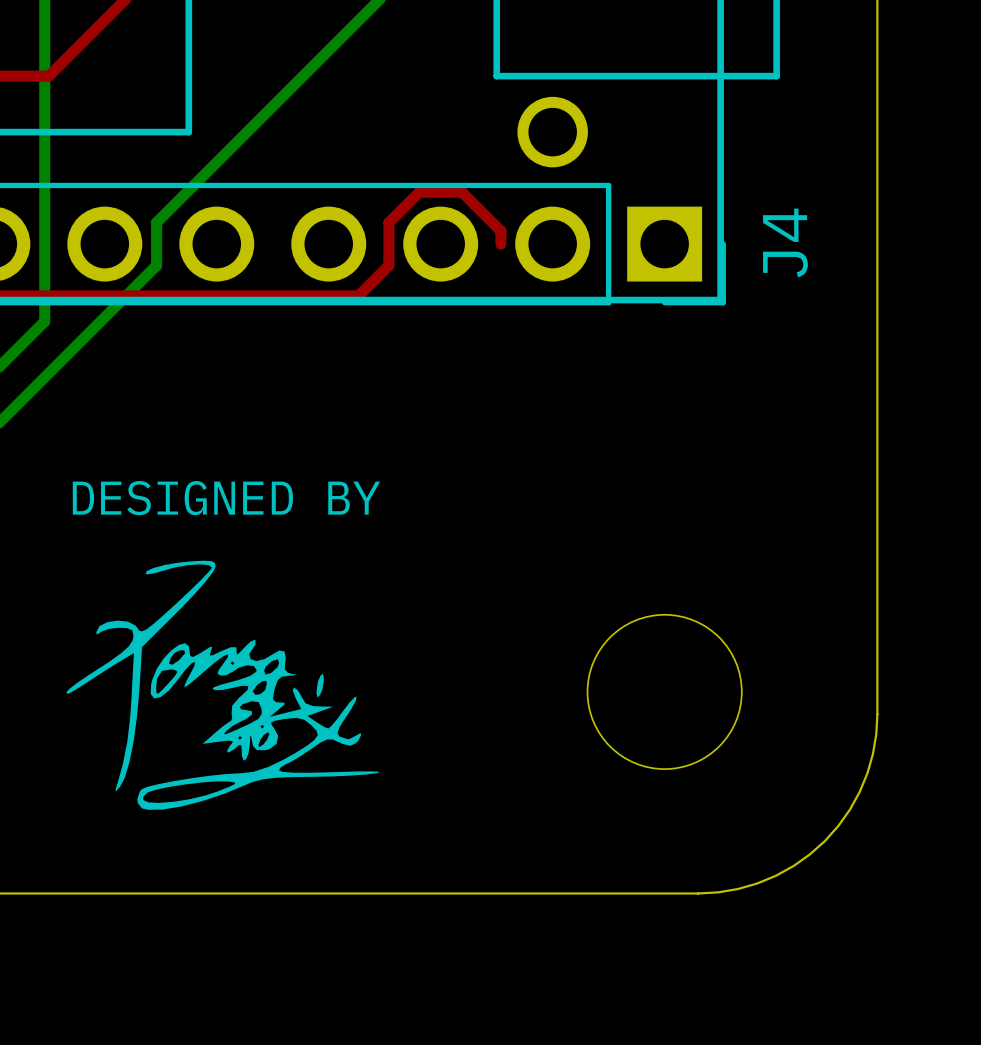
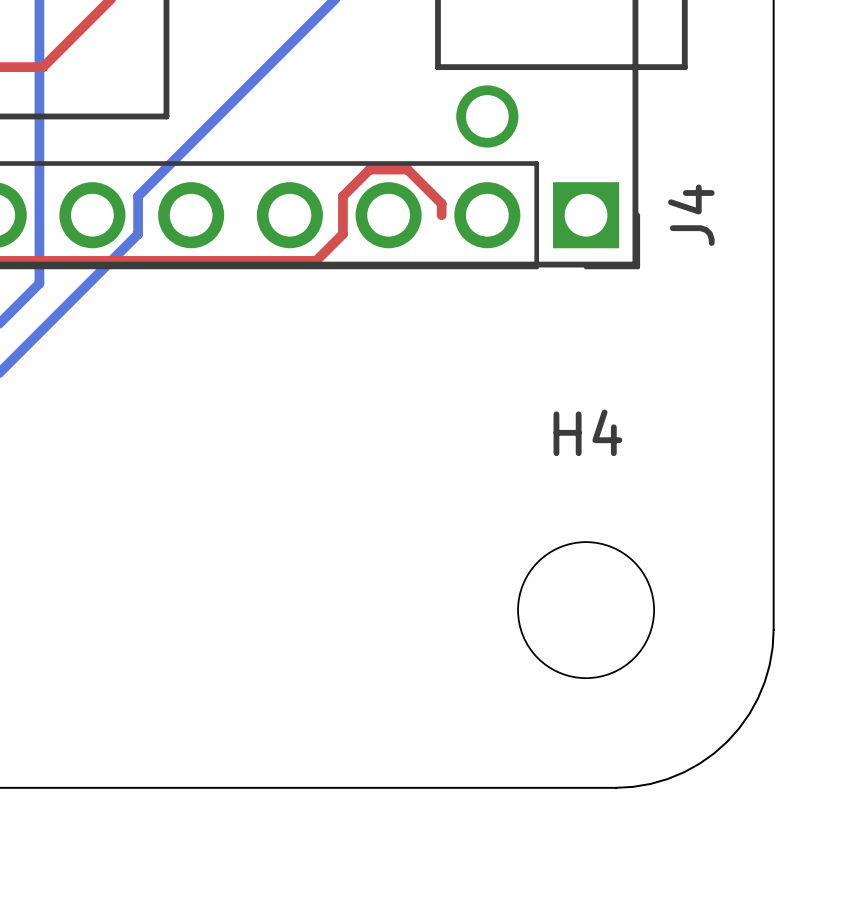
H4 name: none -> H4 (587, 432)
text: DESIGNED BY (226, 498) -> none
drawing: [66, 560, 379, 810] -> none

